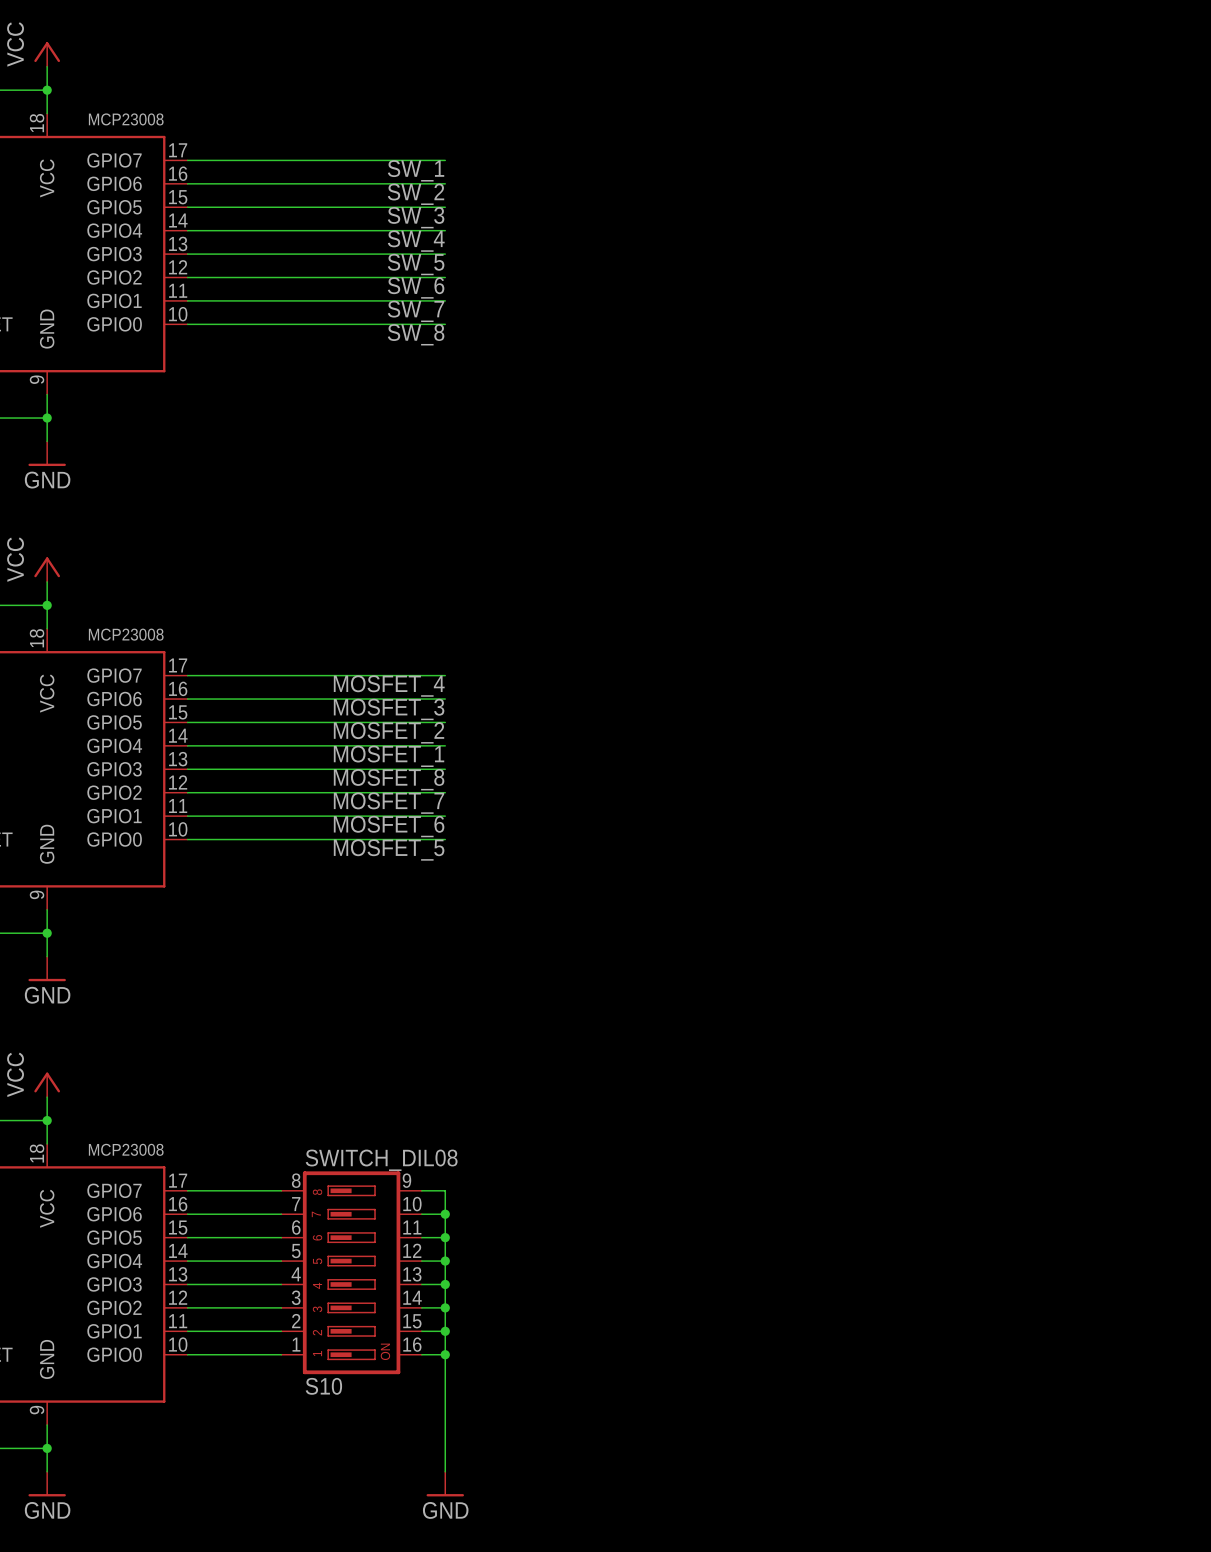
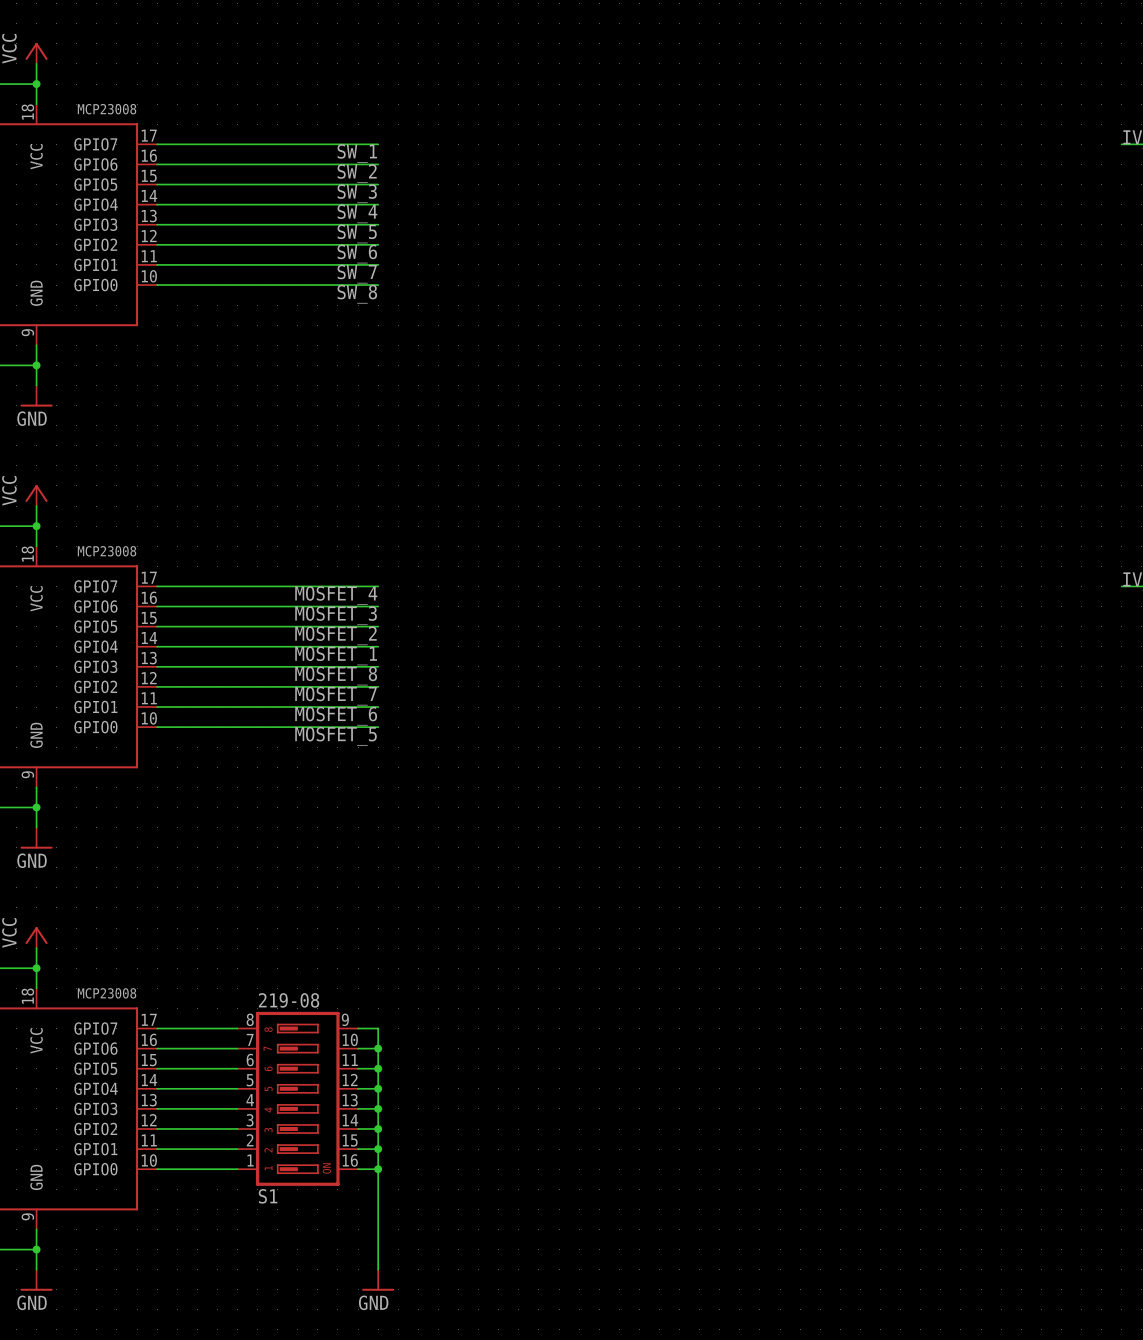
S10 value: SWITCH_DIL08 (381, 1160) -> 219-08 (289, 1000)
S10 name: S10 (323, 1386) -> S1 (268, 1196)

